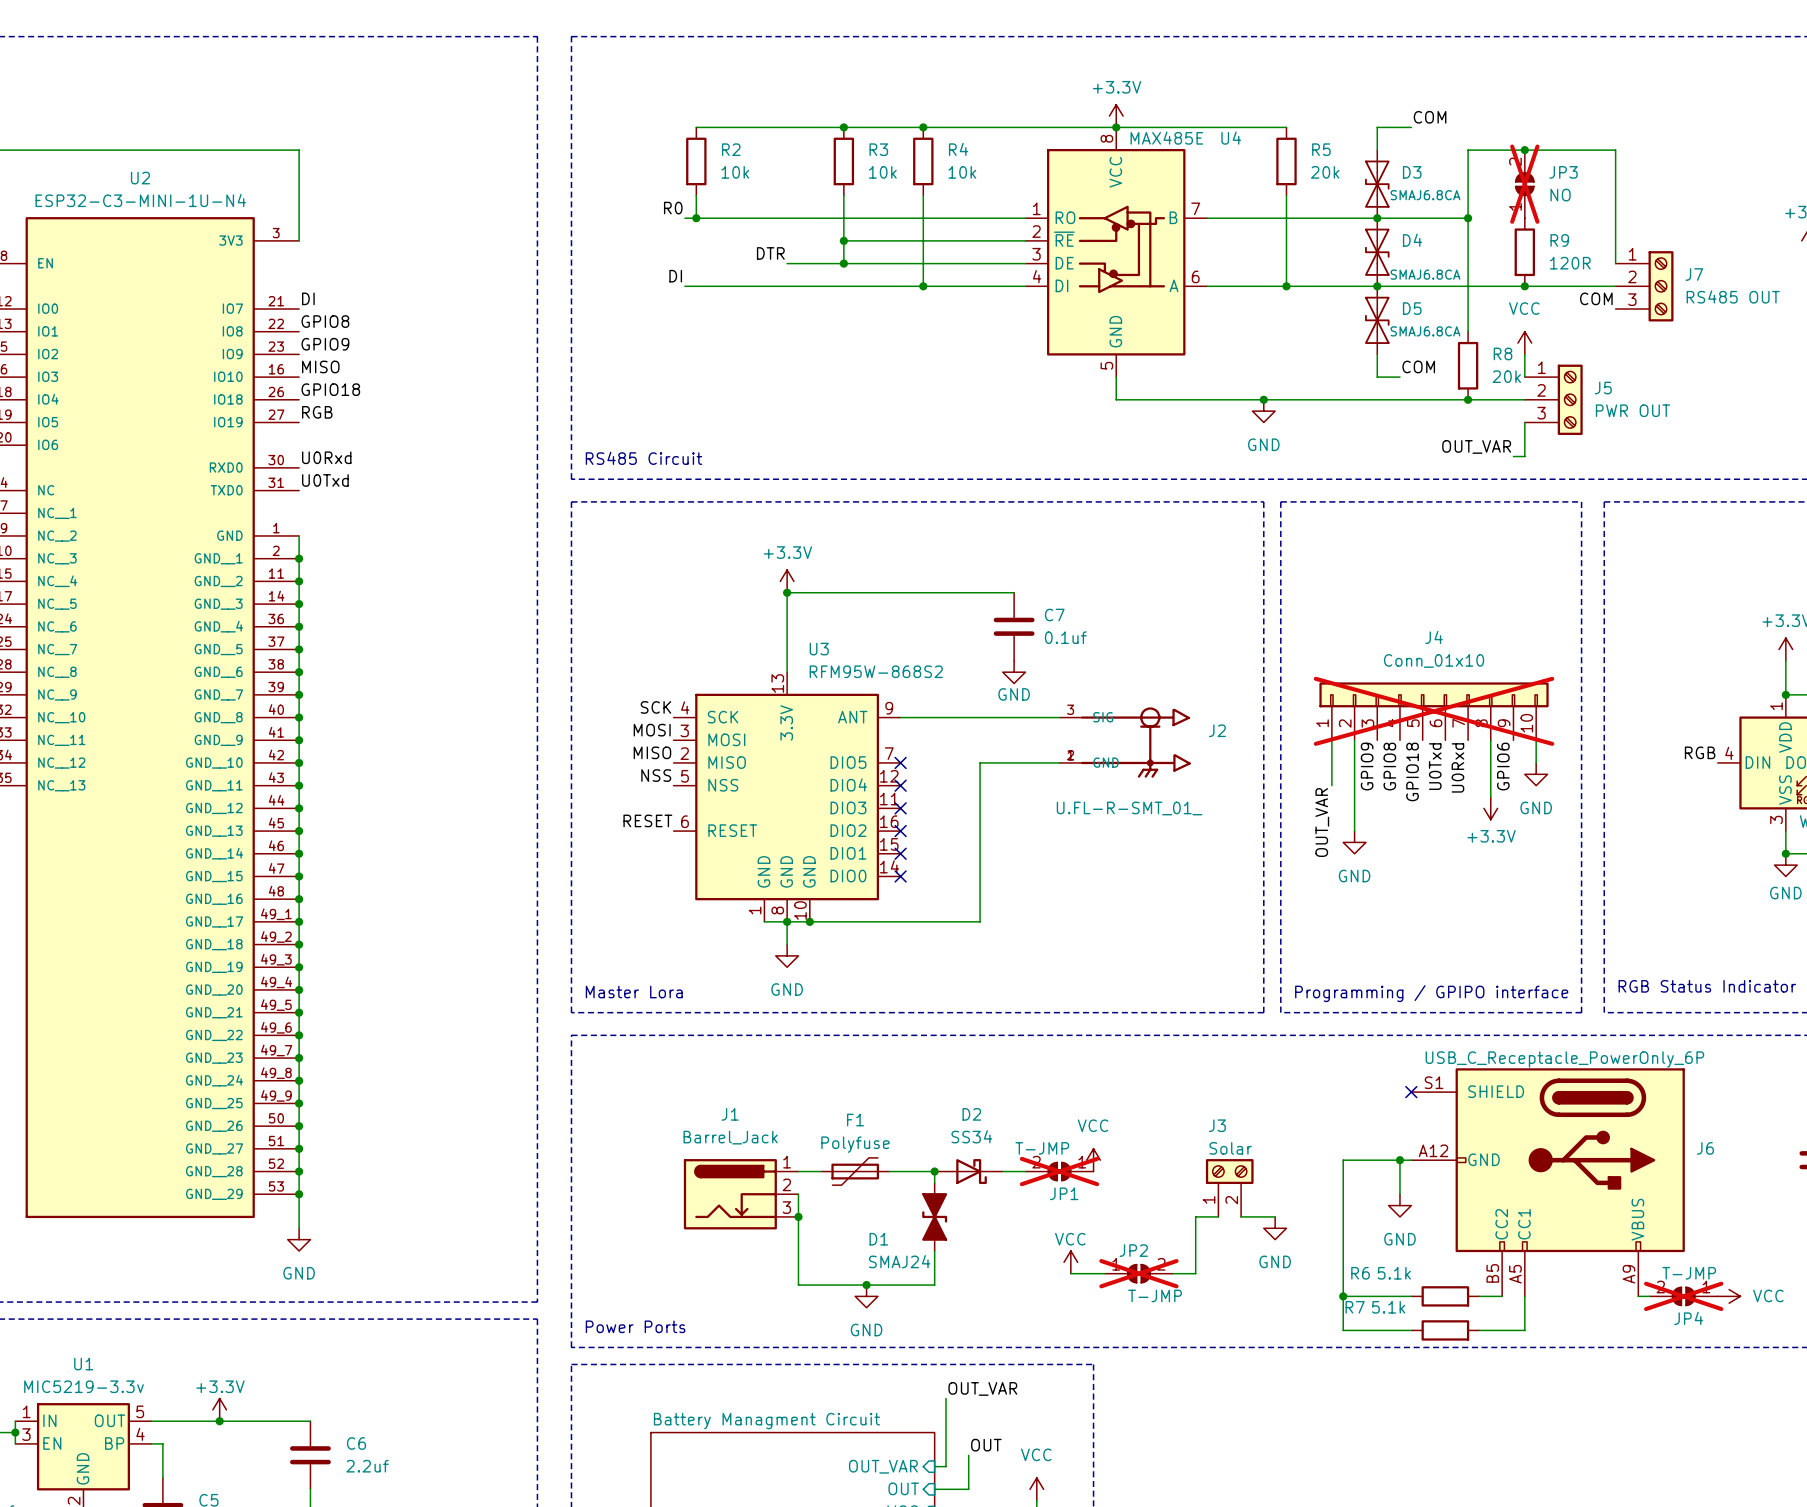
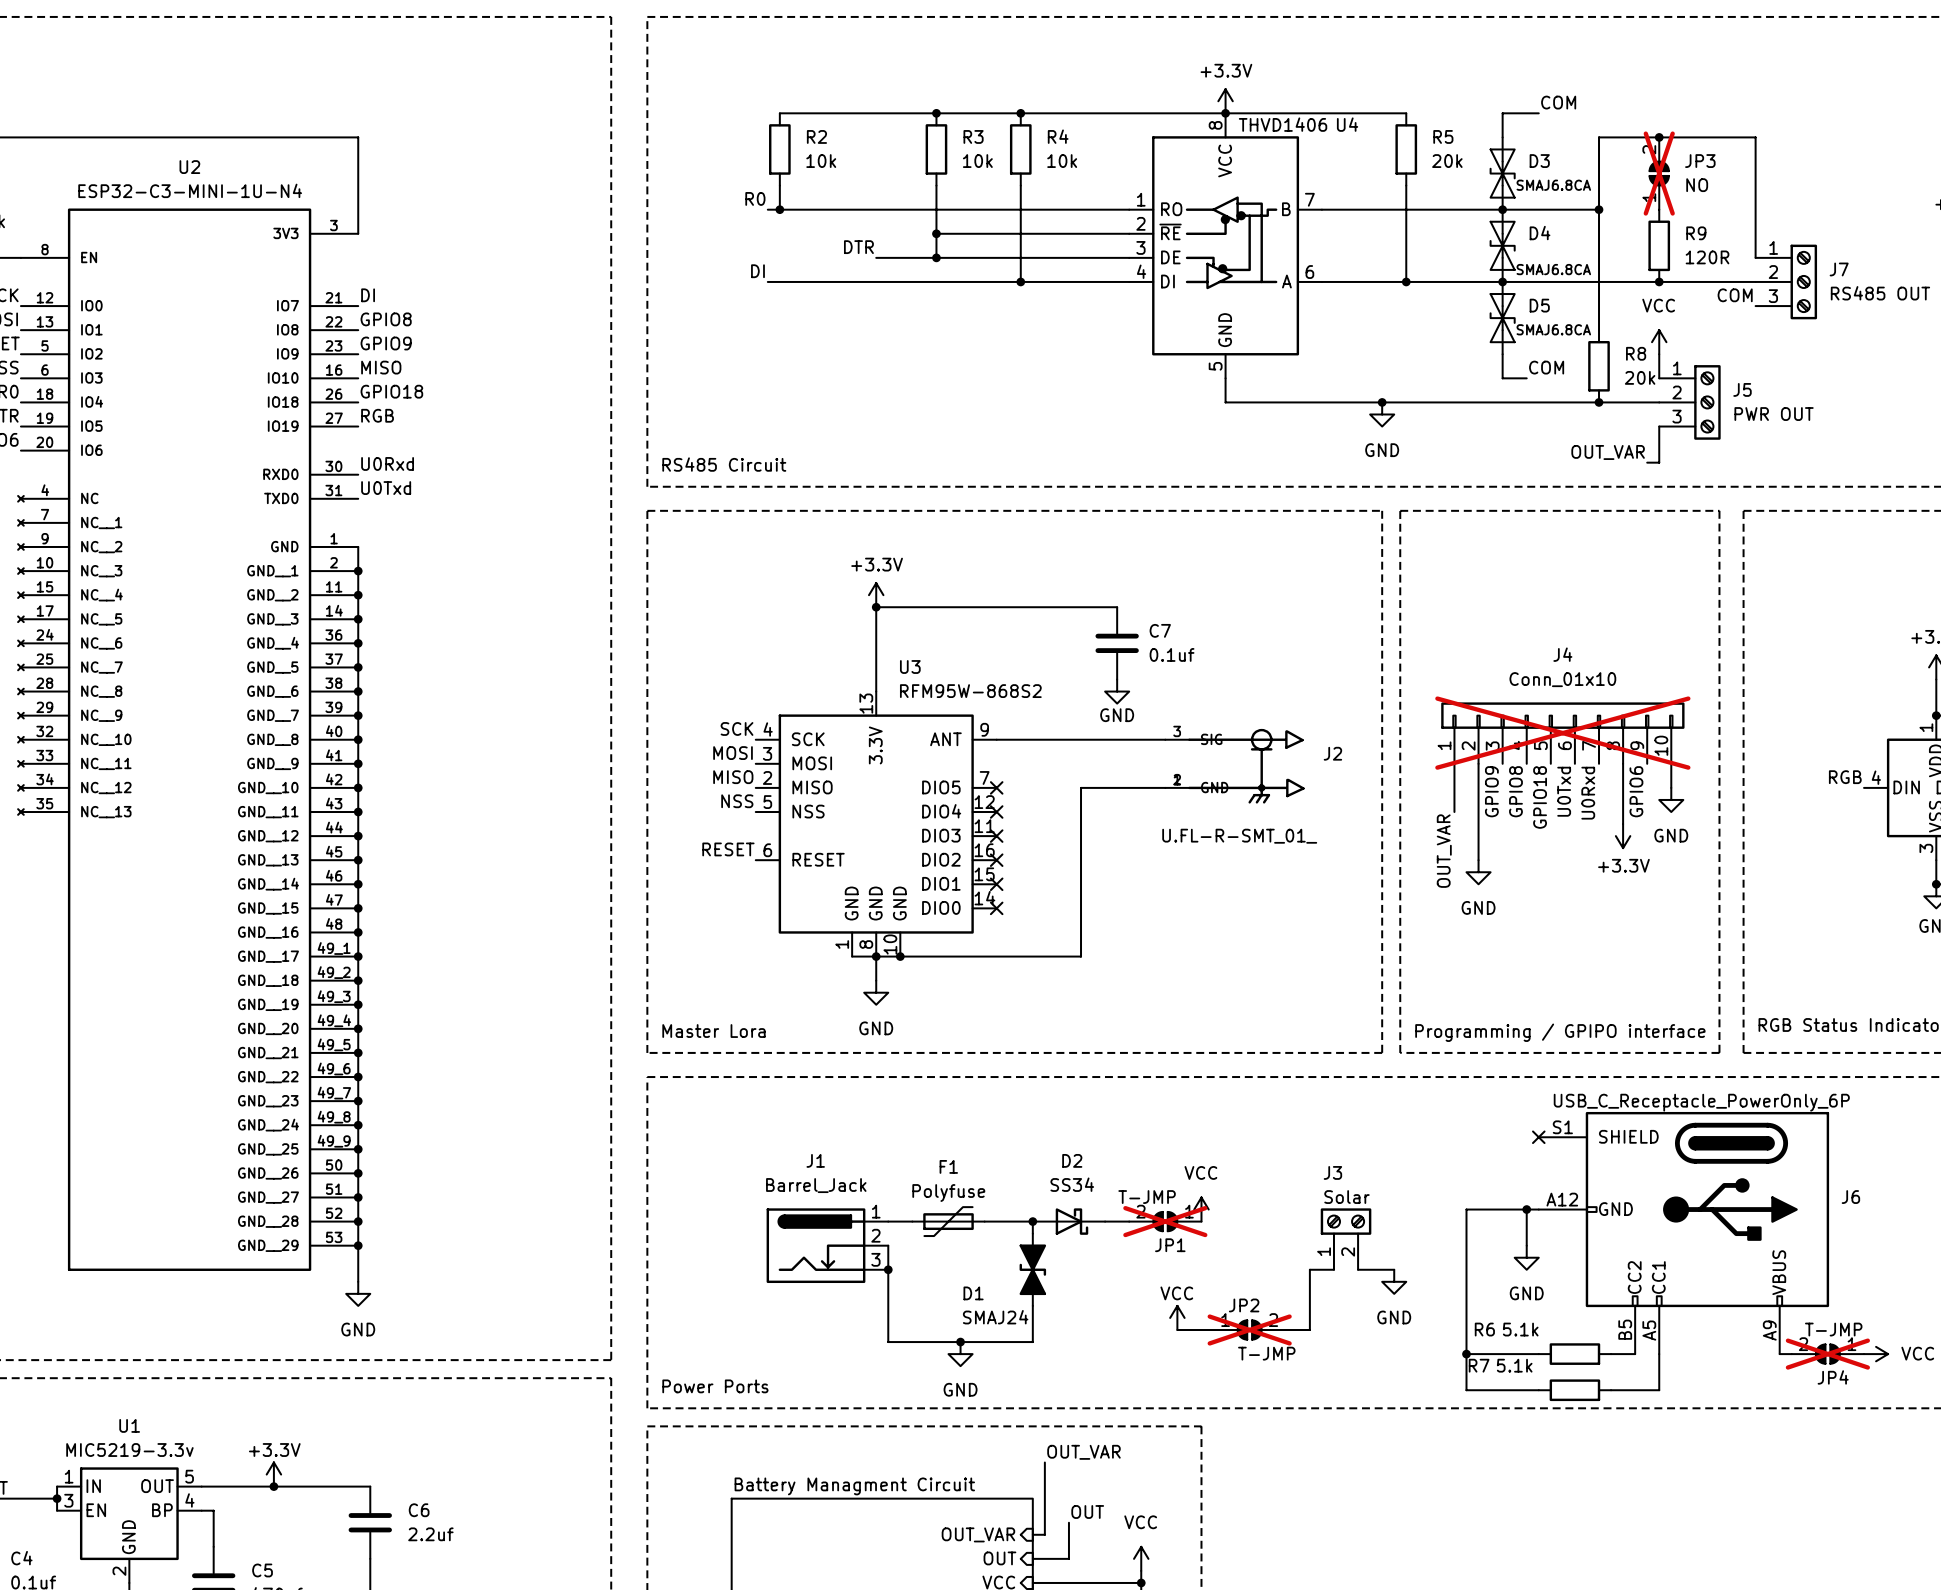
U4 value: MAX485E (1166, 138) -> THVD1406 (1283, 124)

